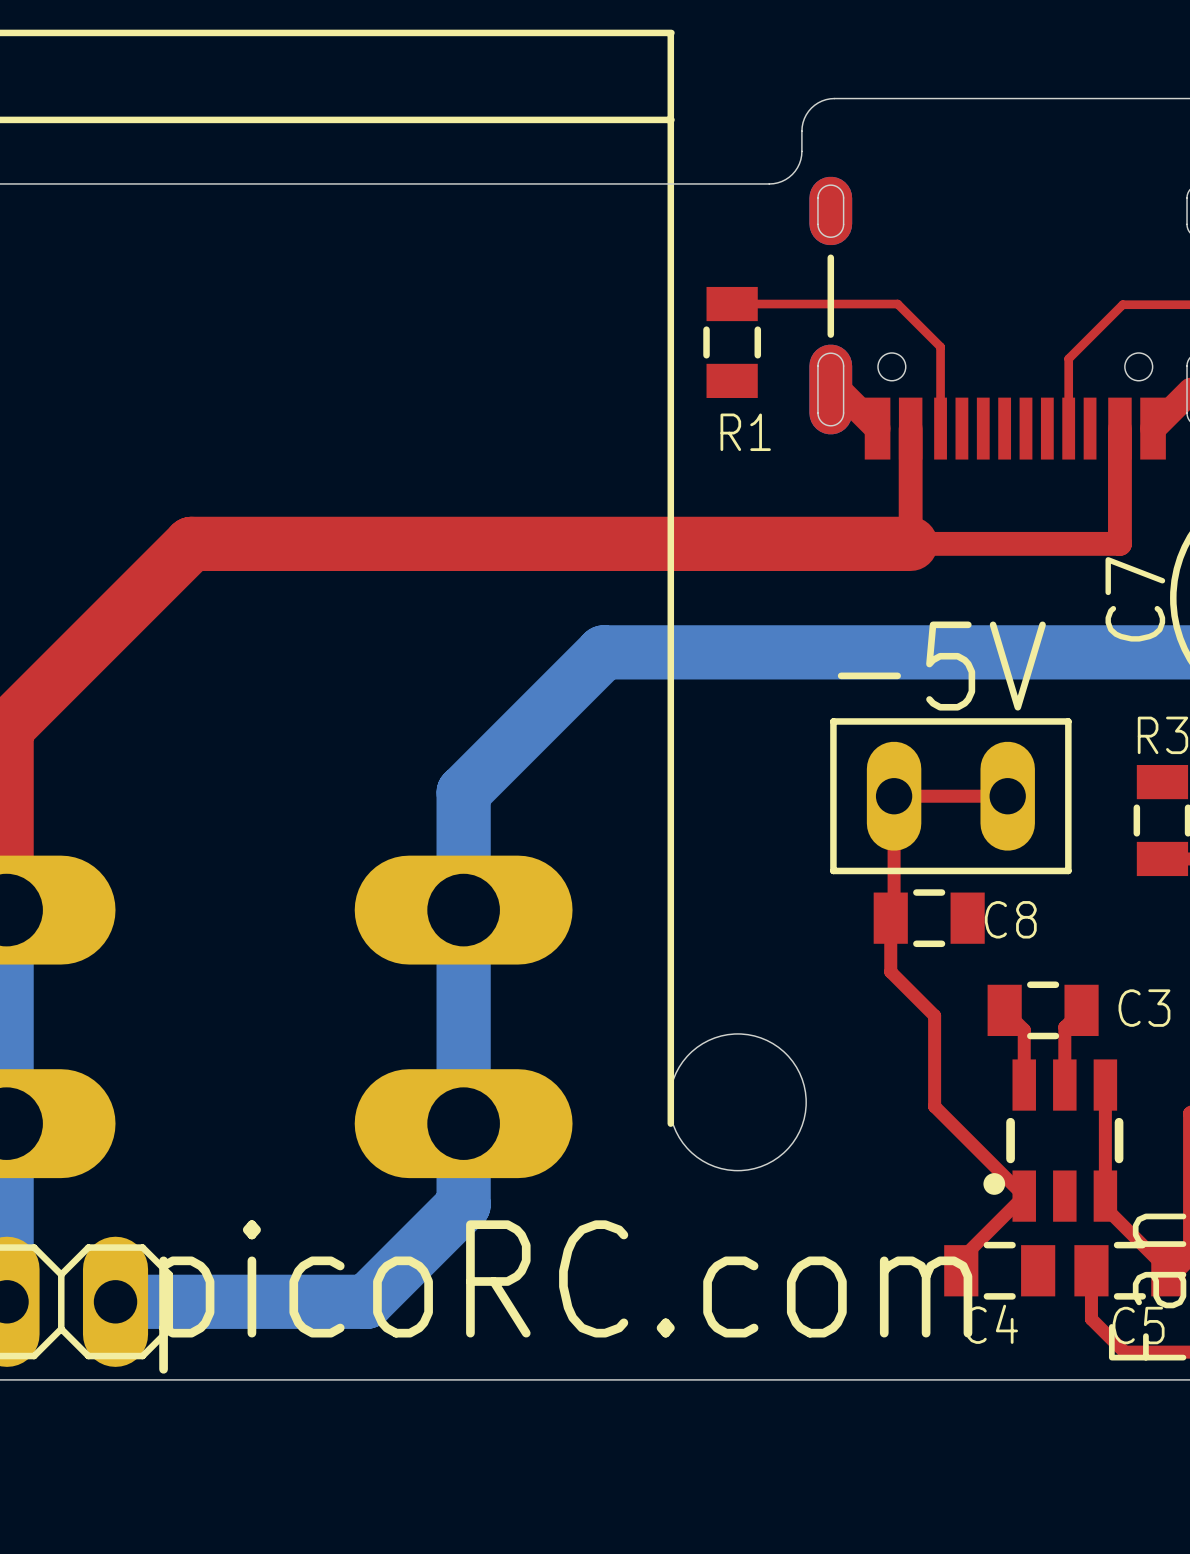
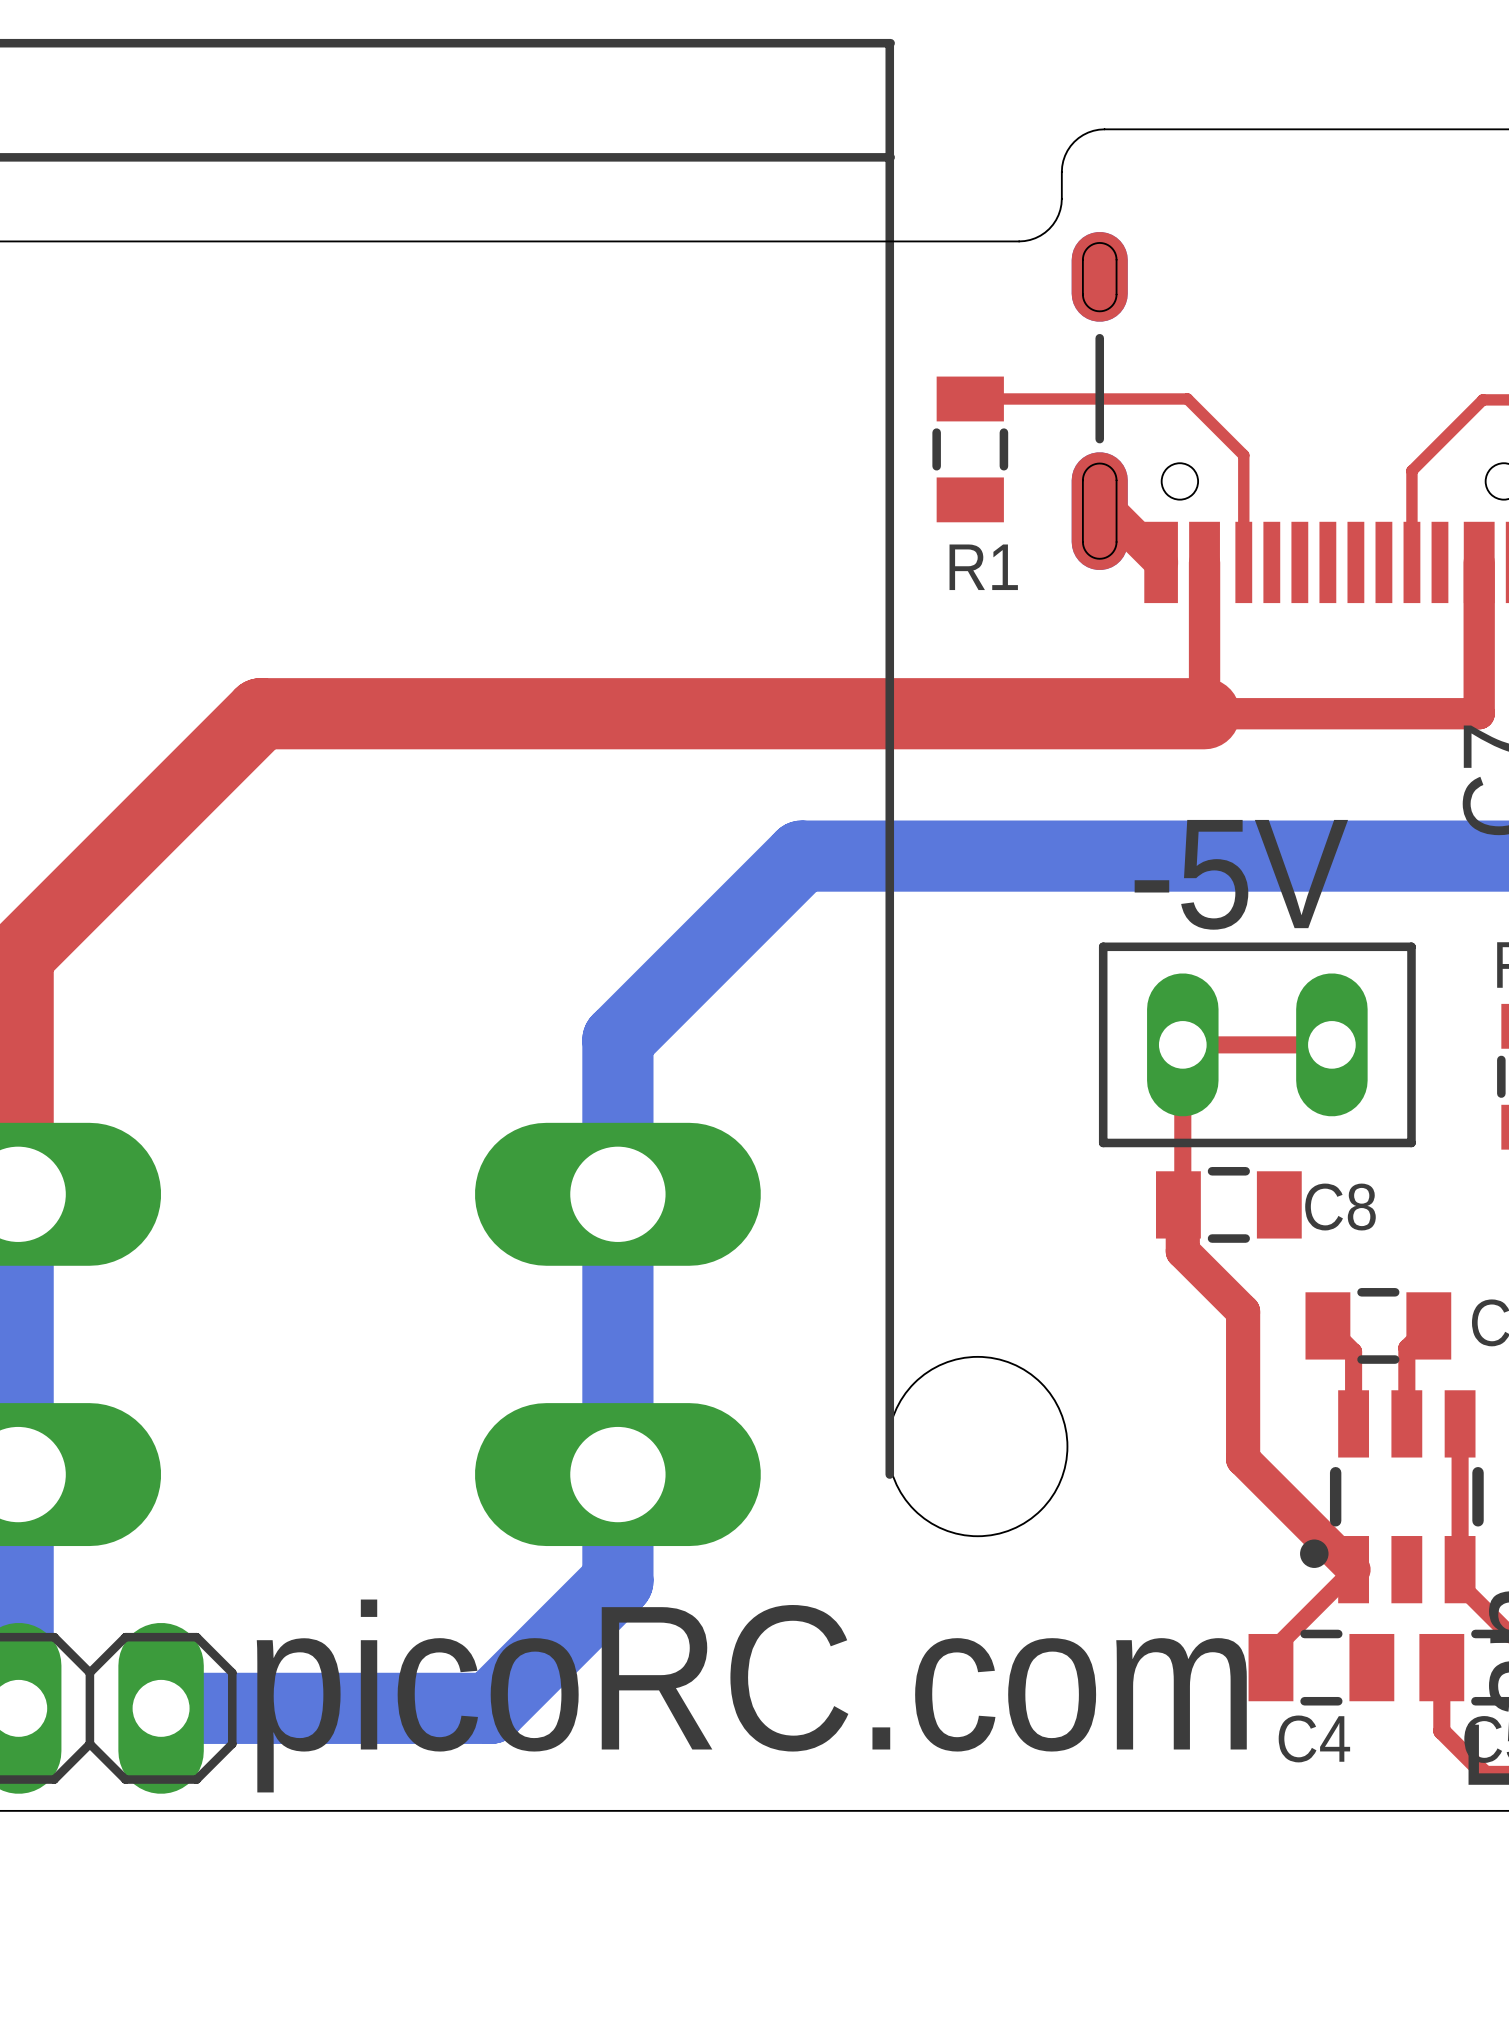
top track: (890, 918) (890, 971) (934, 1015) (934, 1106) (940, 1111) -> (1182, 1200) (1182, 1251) (1243, 1311) (1243, 1459)
top track width: thin (940, 1111) (1024, 1196) -> thick (1243, 1459) (1353, 1569)

